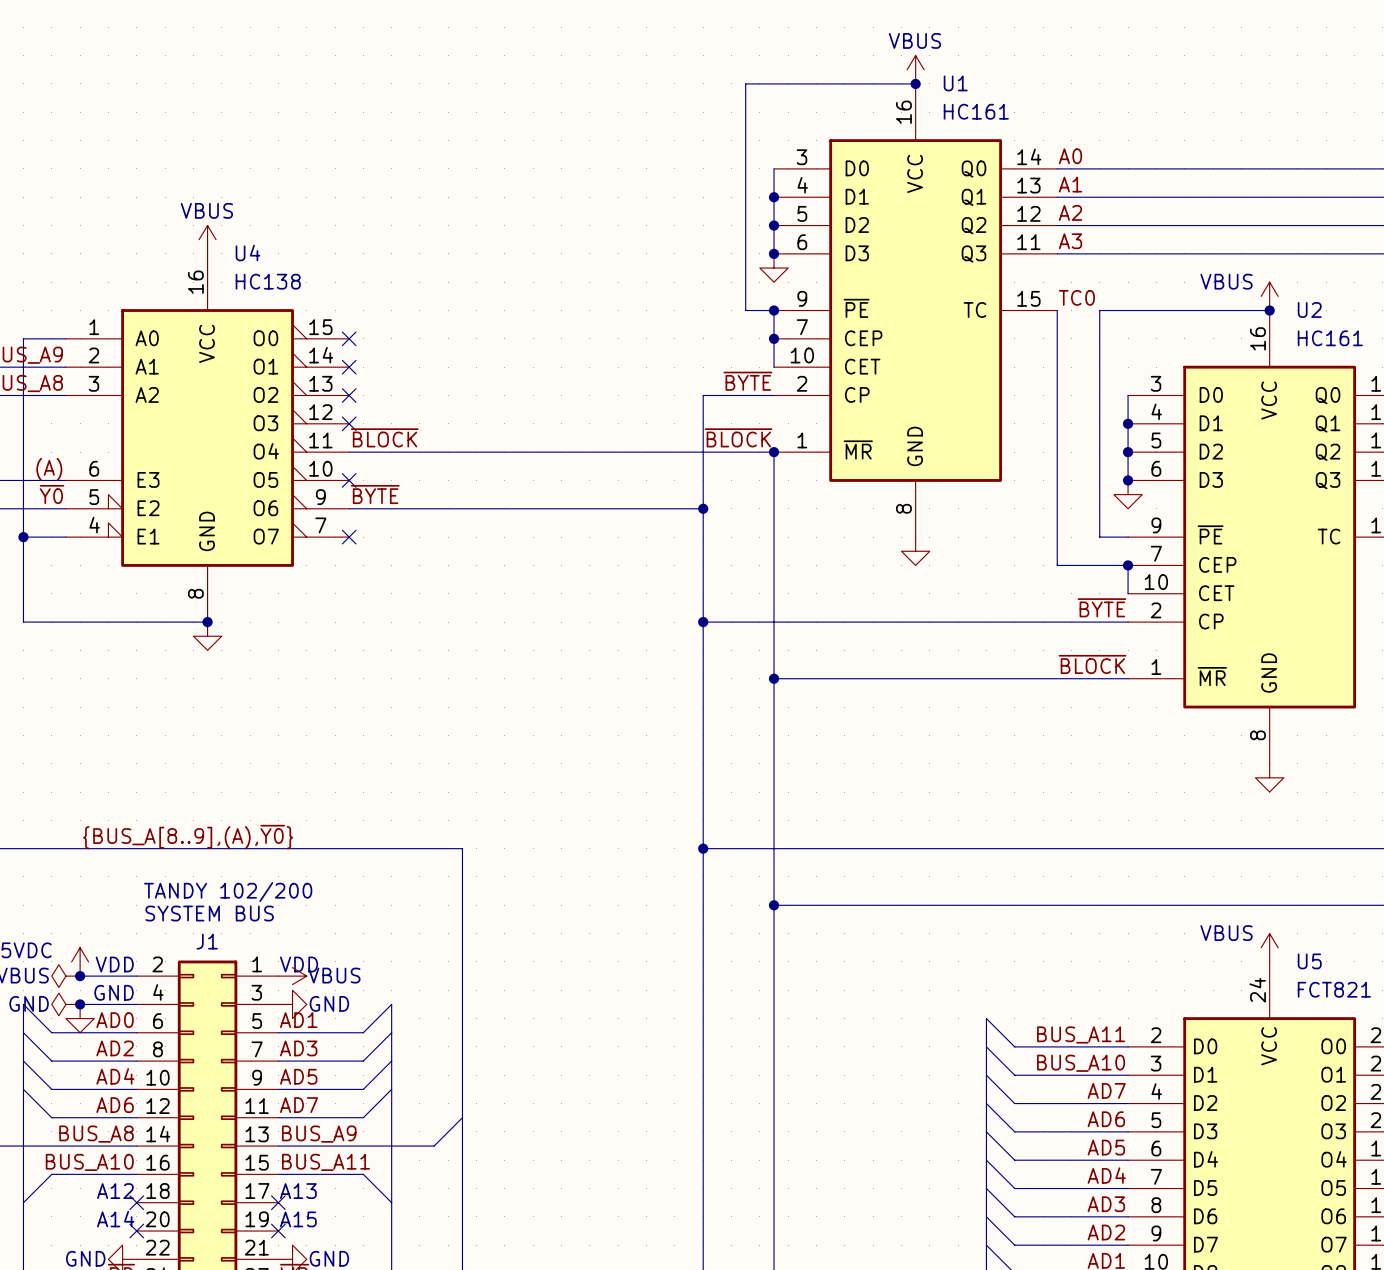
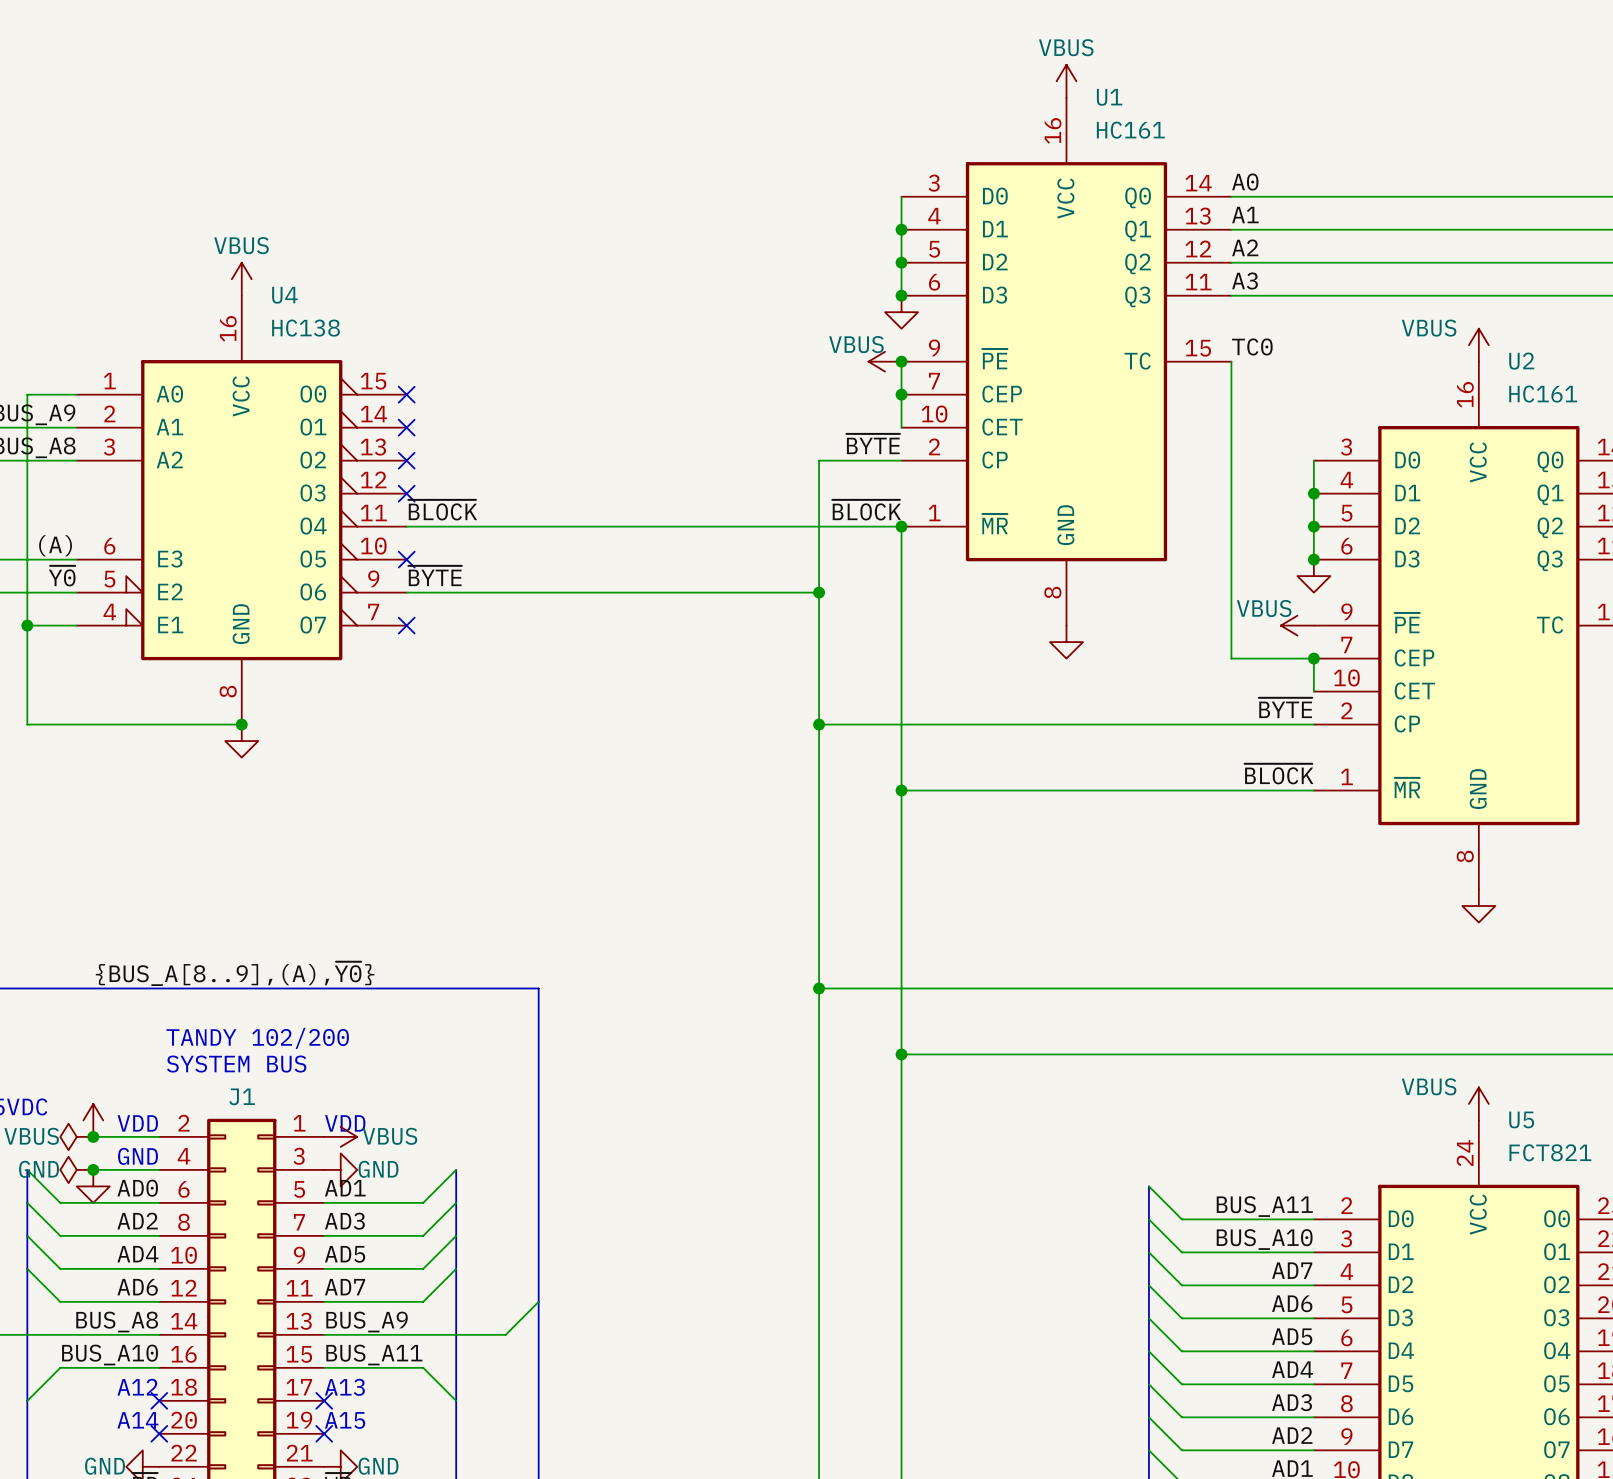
wire: (915, 83) (745, 83) (745, 310) (774, 310) -> none
junction: (915, 83) -> none
power symbol: none -> VBUS (885, 361)
wire: (1269, 310) (1099, 310) (1099, 537) (1128, 537) -> none
junction: (1269, 310) -> none
power symbol: none -> VBUS (1297, 625)

